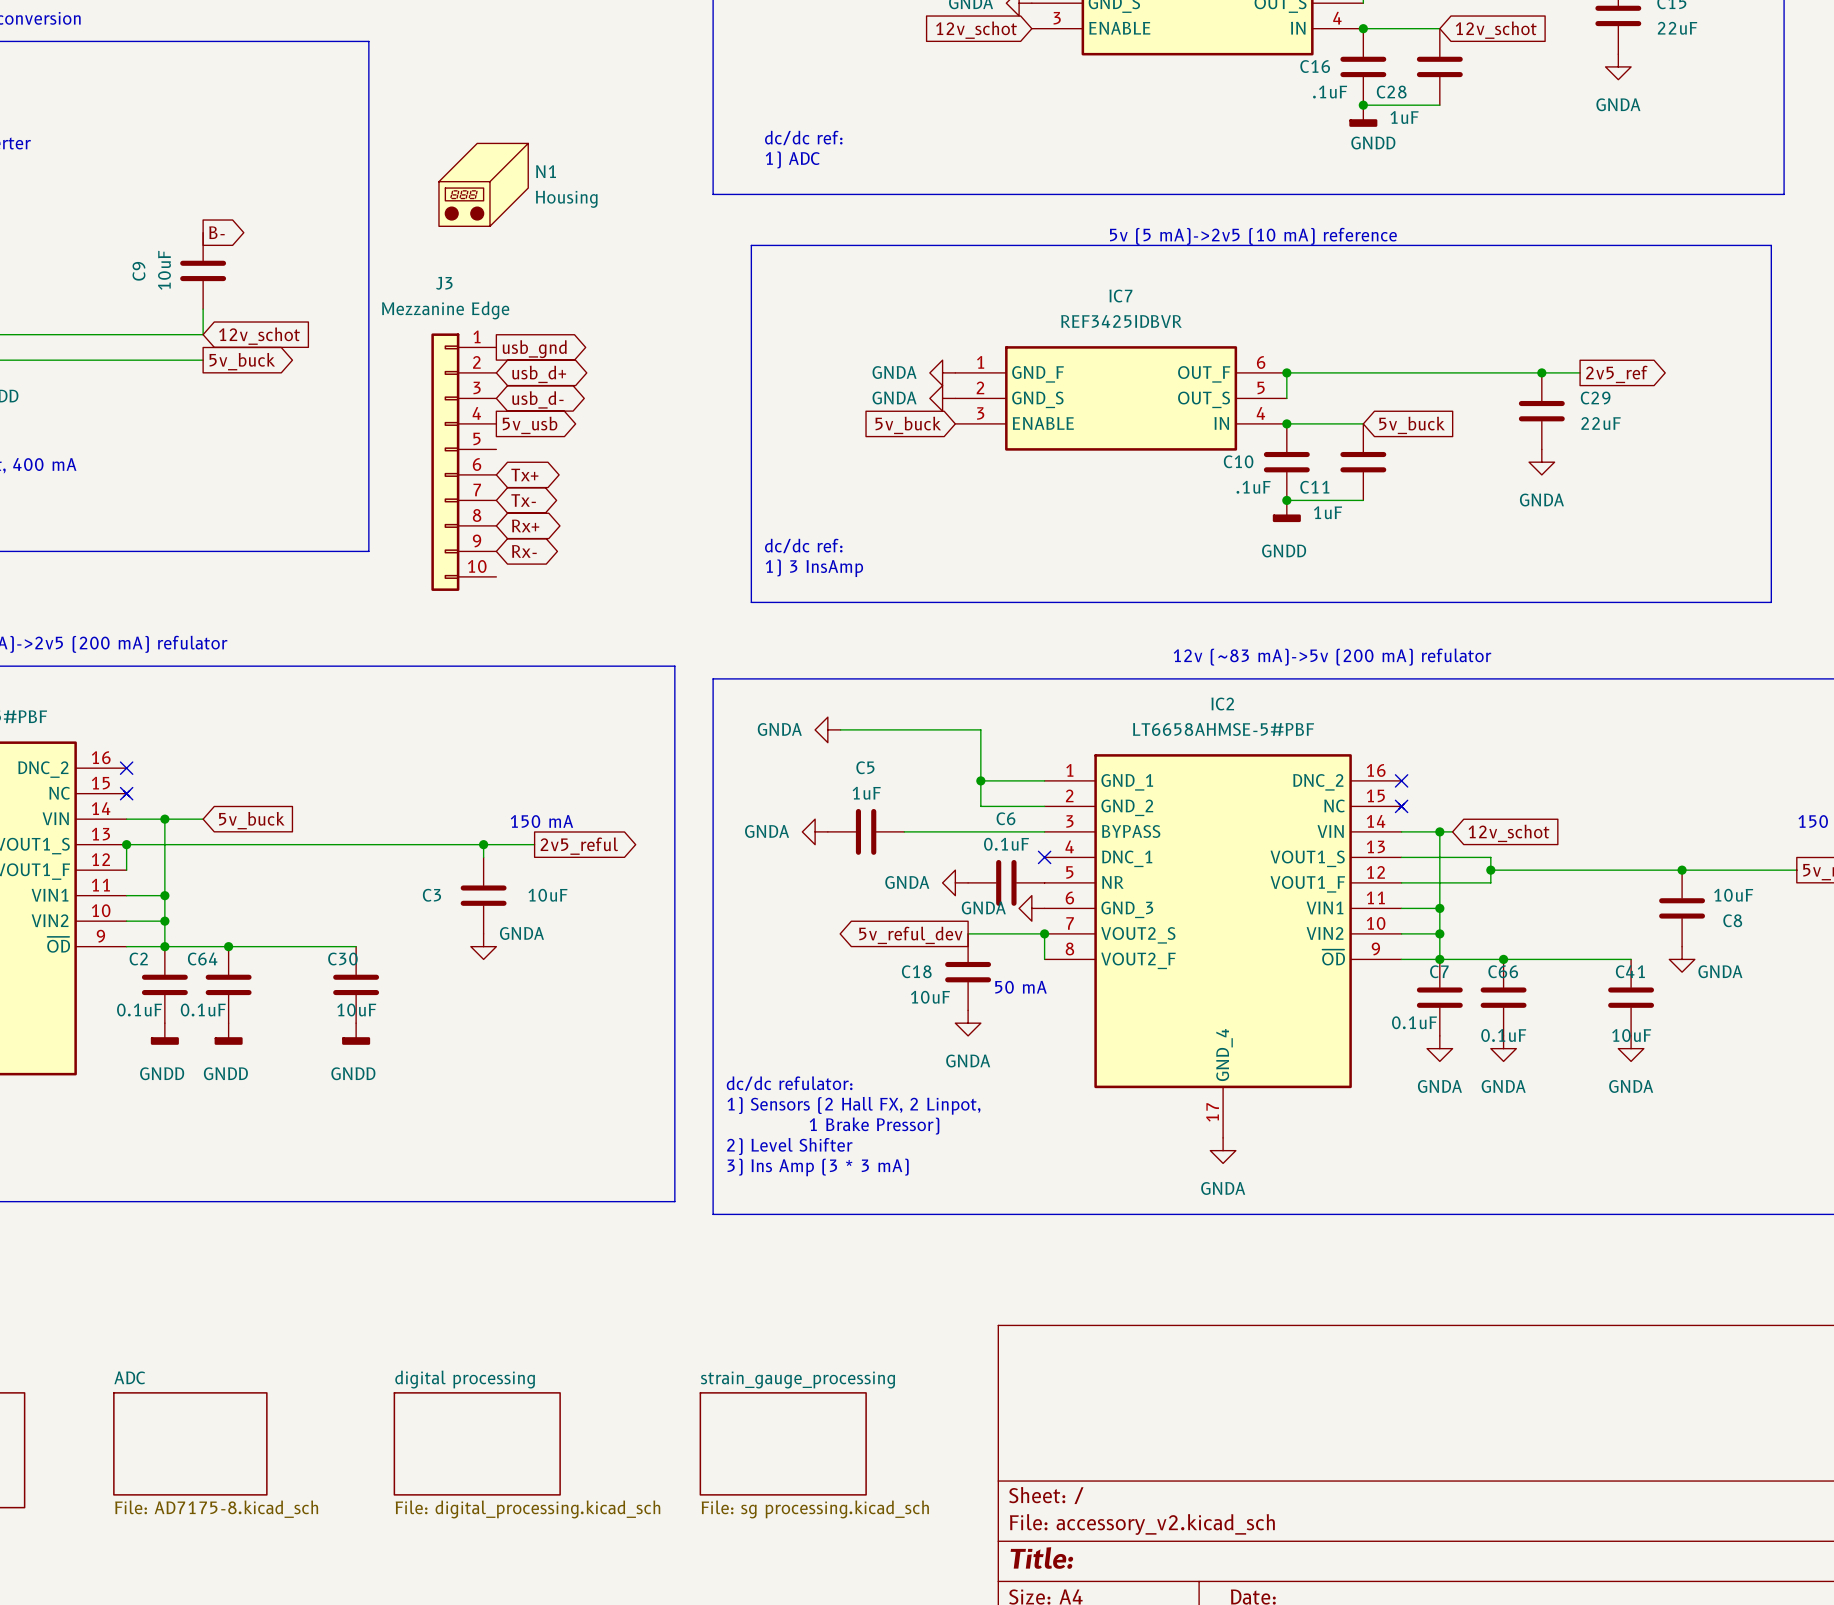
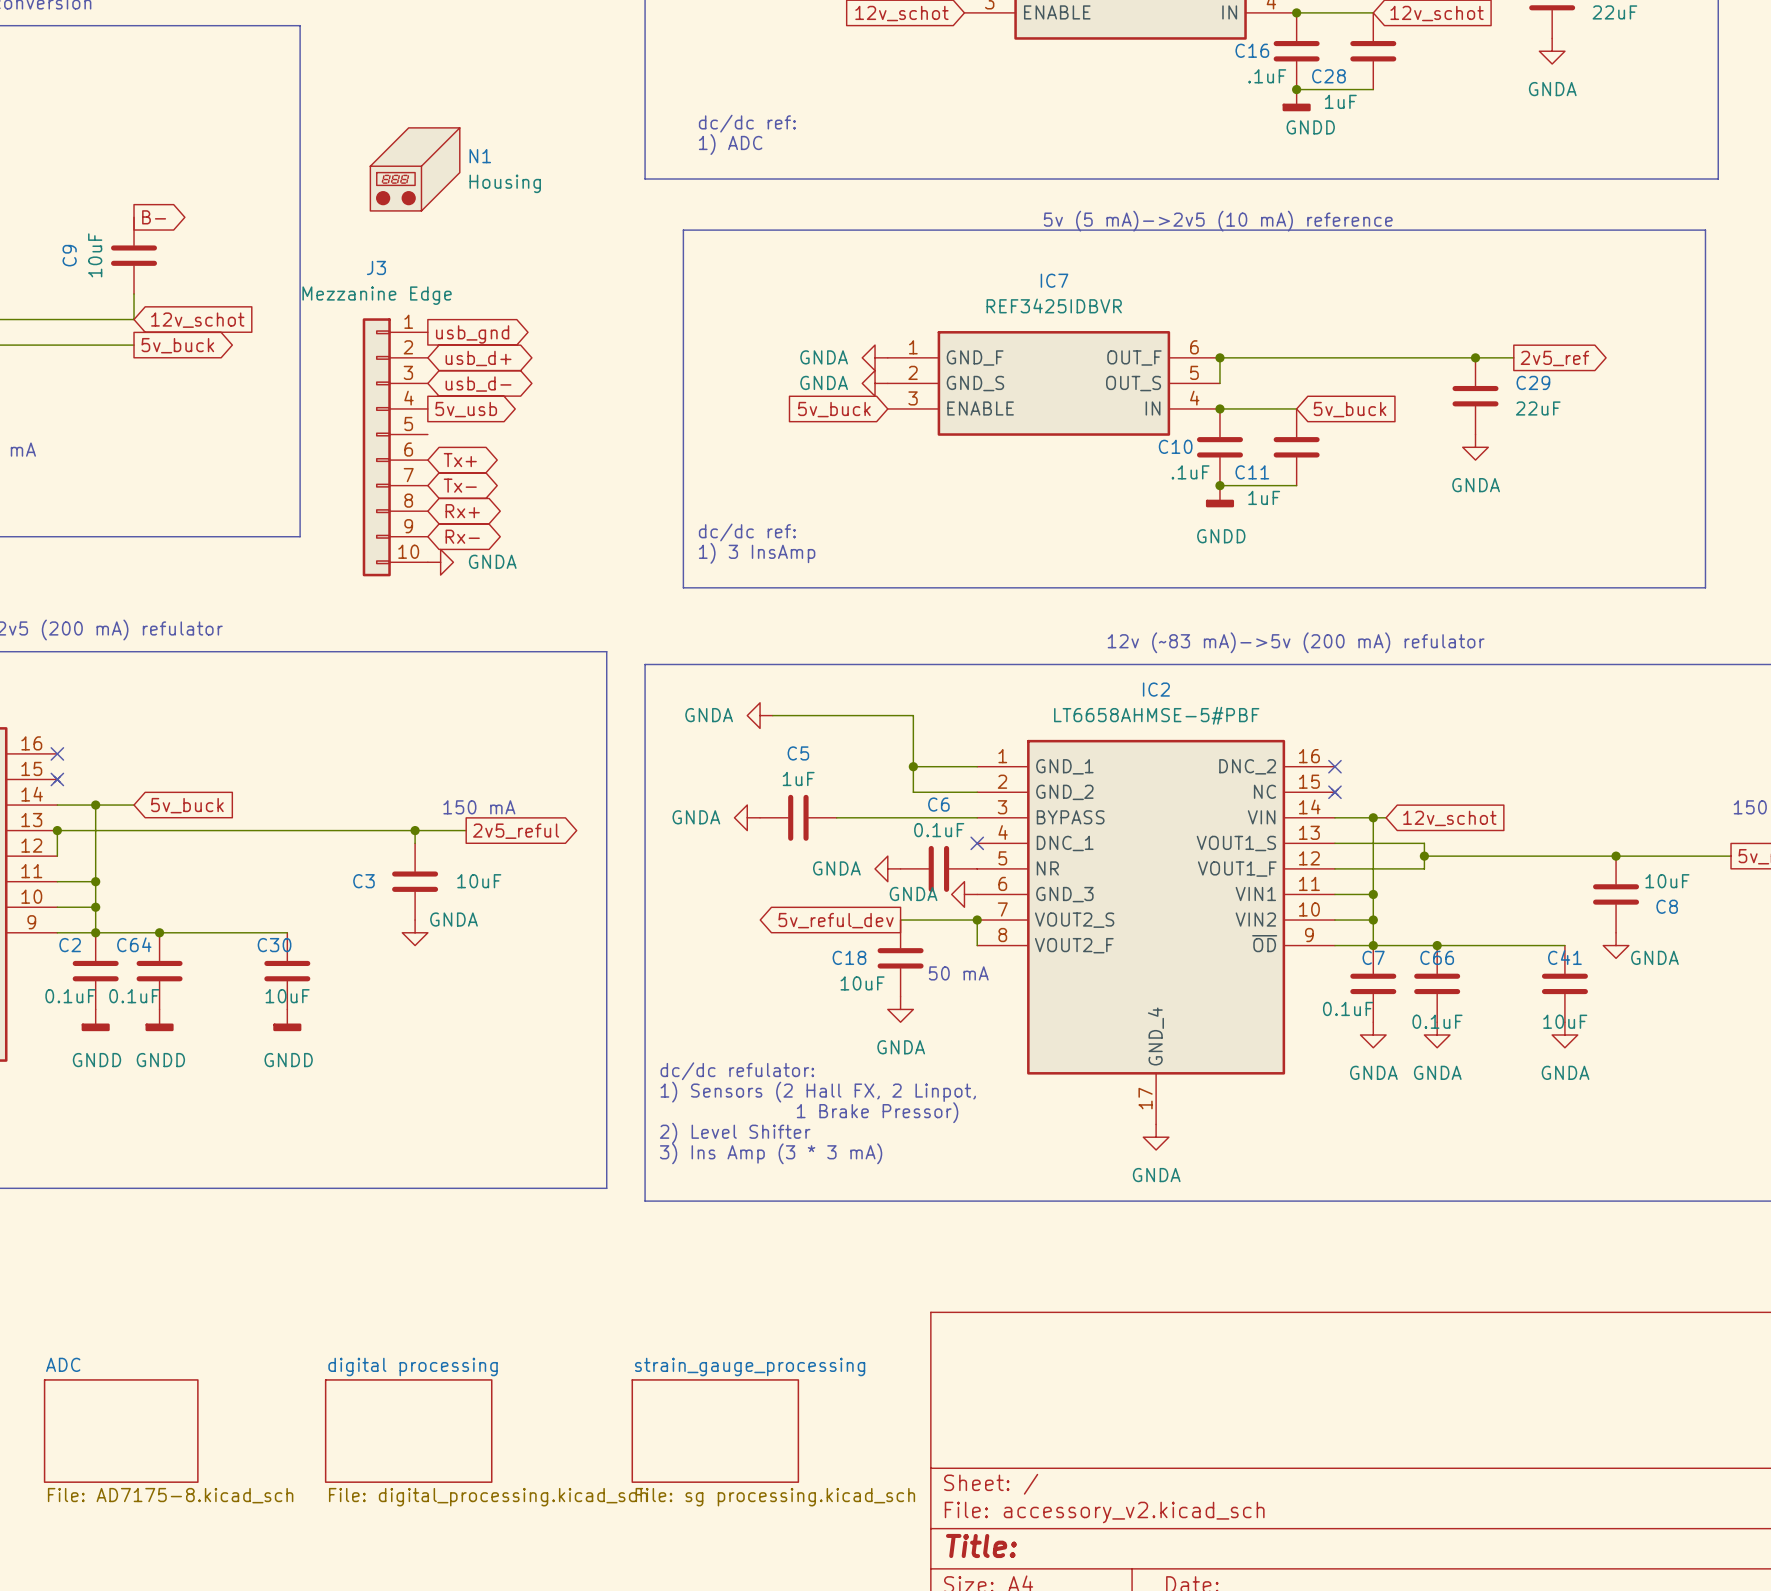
power symbol: none -> GNDA (440, 562)

